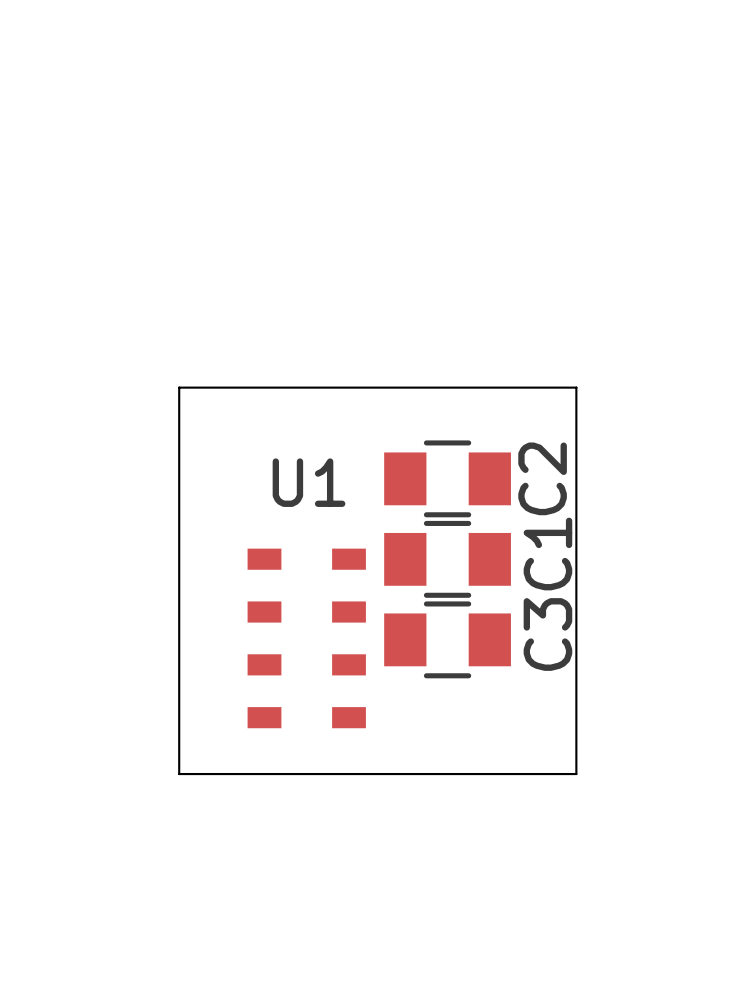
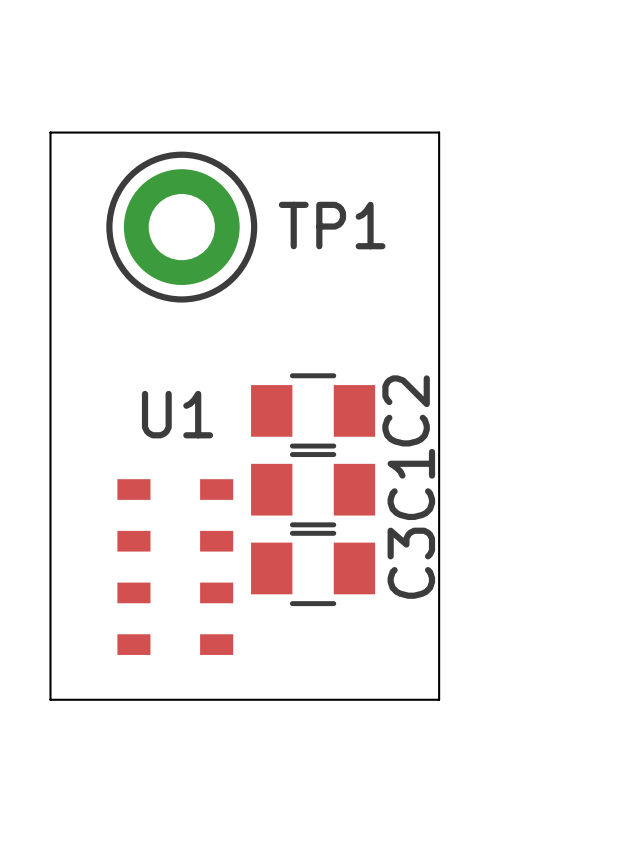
TP1: none -> (181, 227)
board edge: (179, 387) (576, 387) -> (50, 321) (50, 132) (439, 132) (439, 321)

